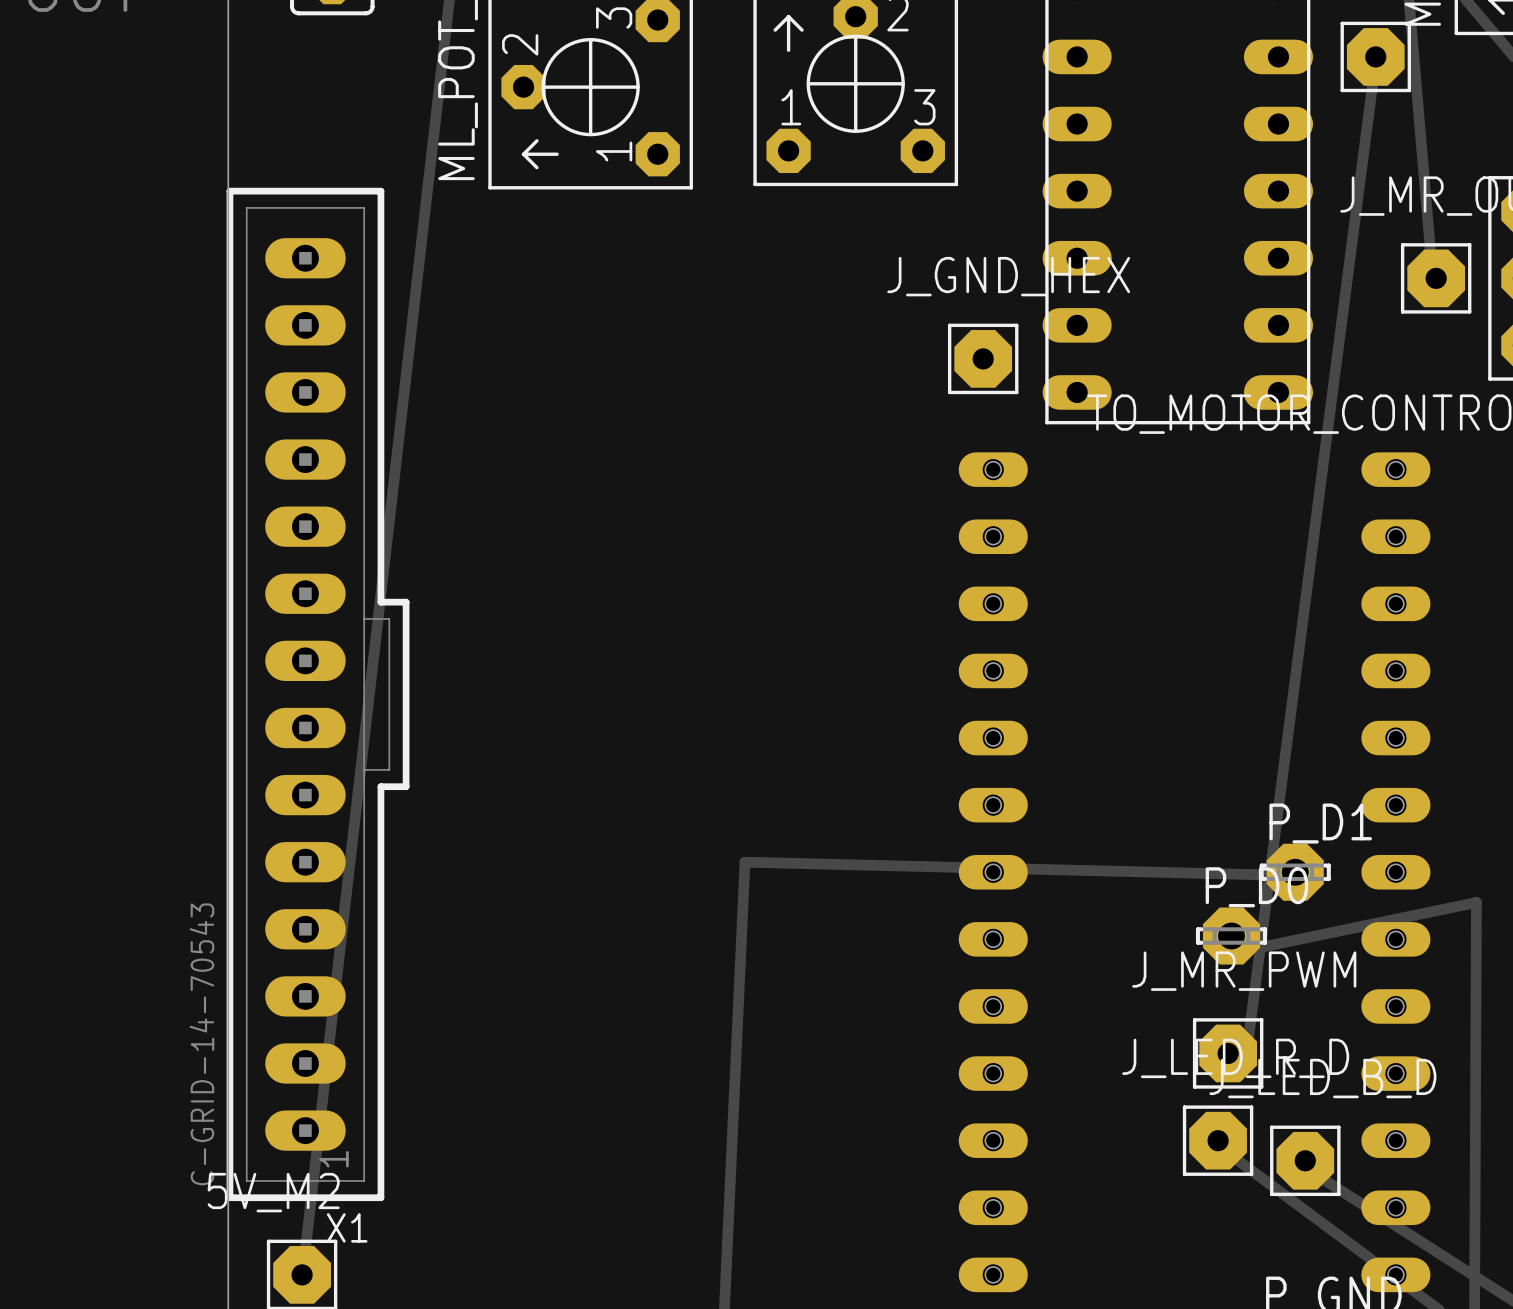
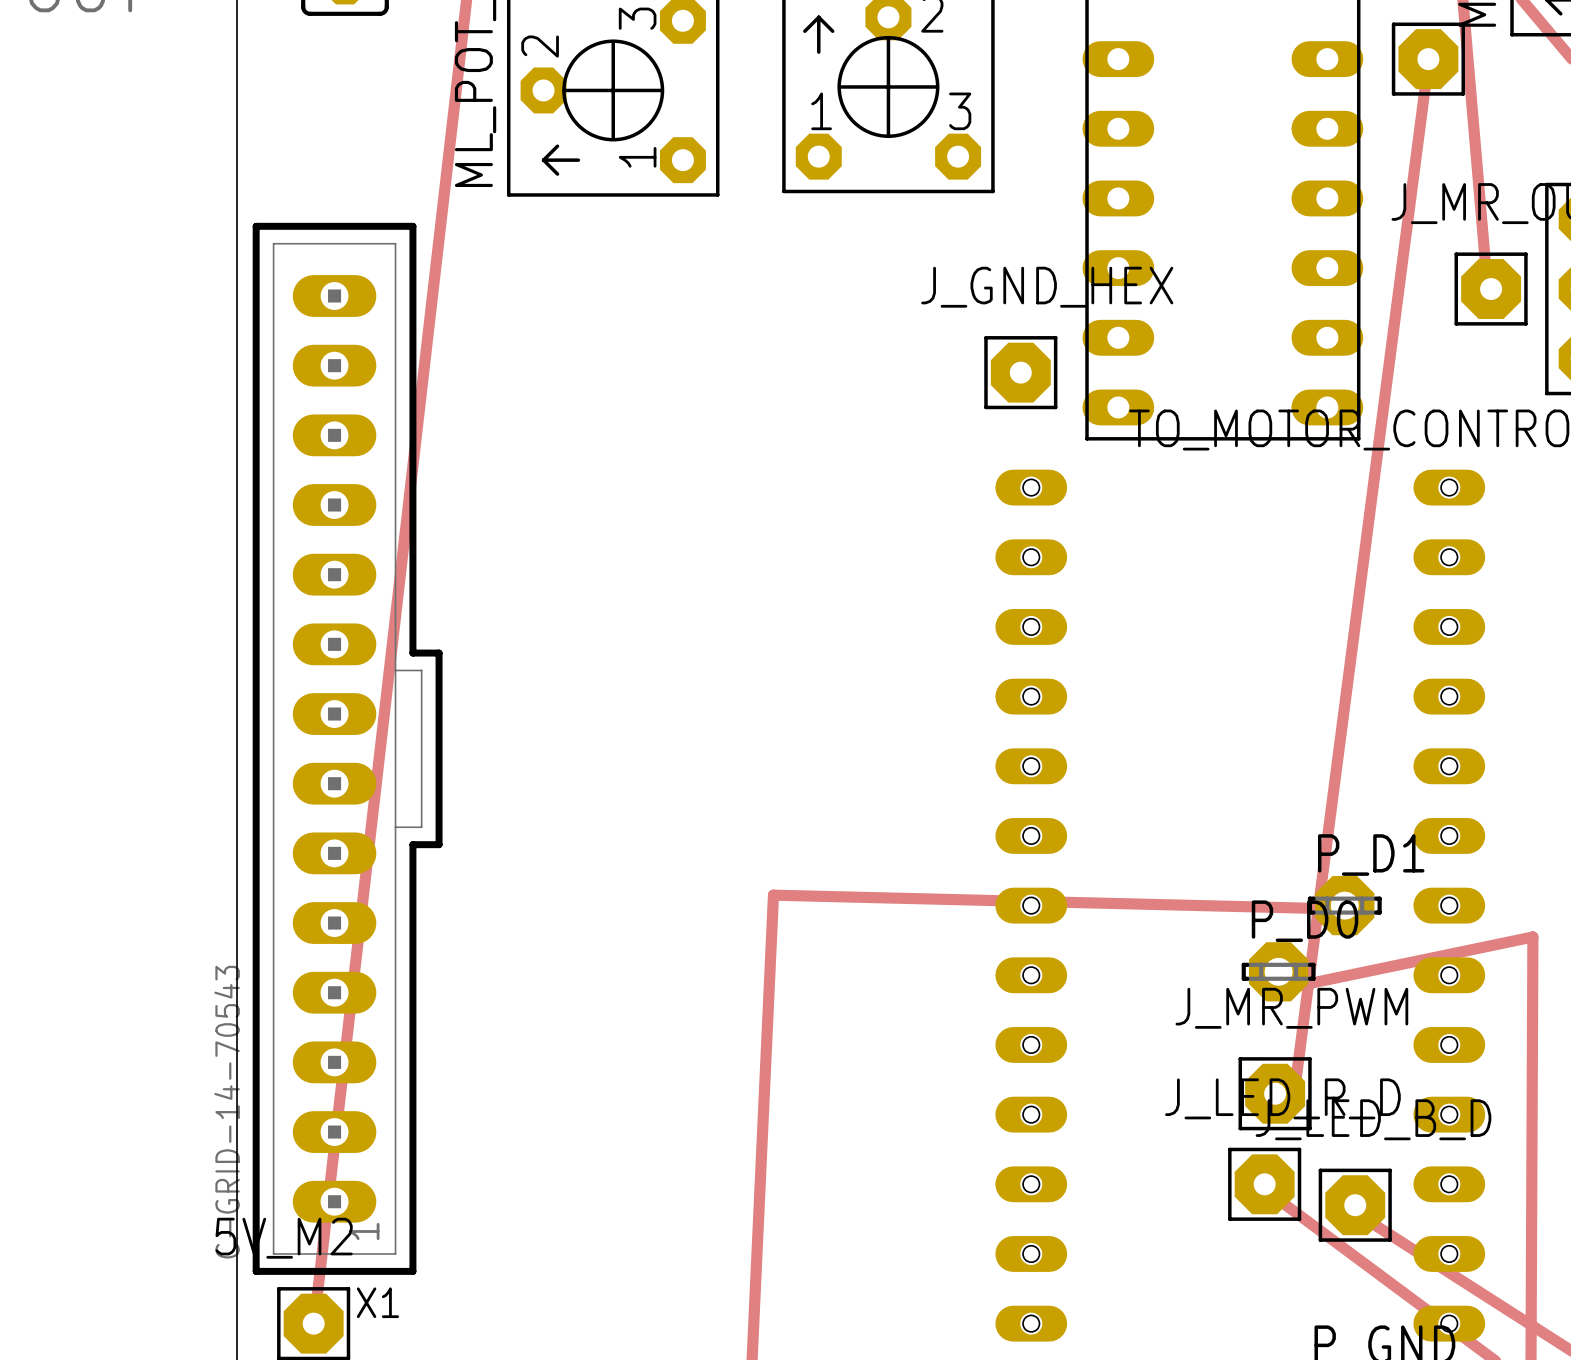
X1 position: (318, 694) -> (347, 748)

